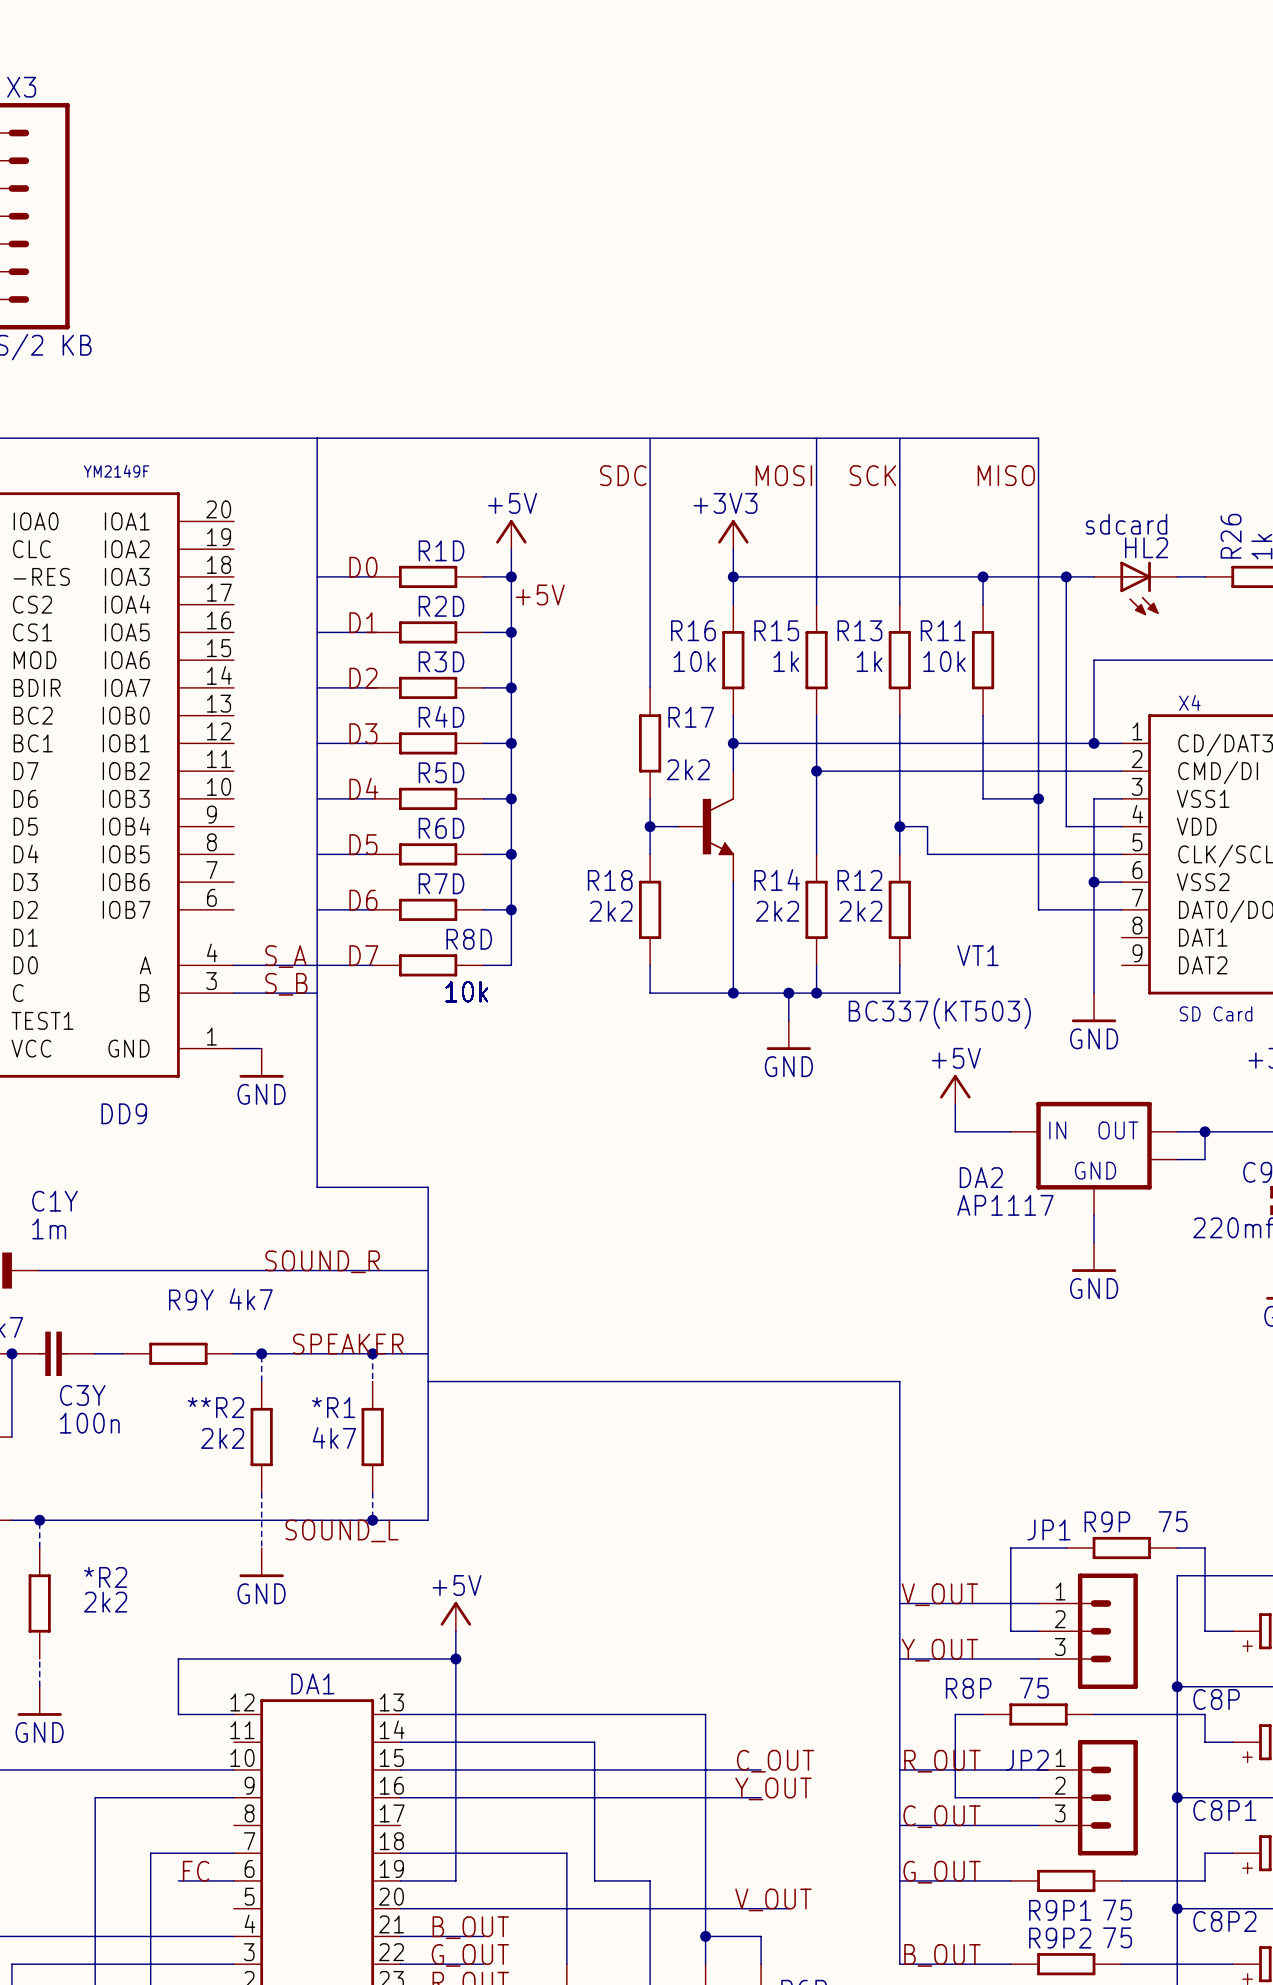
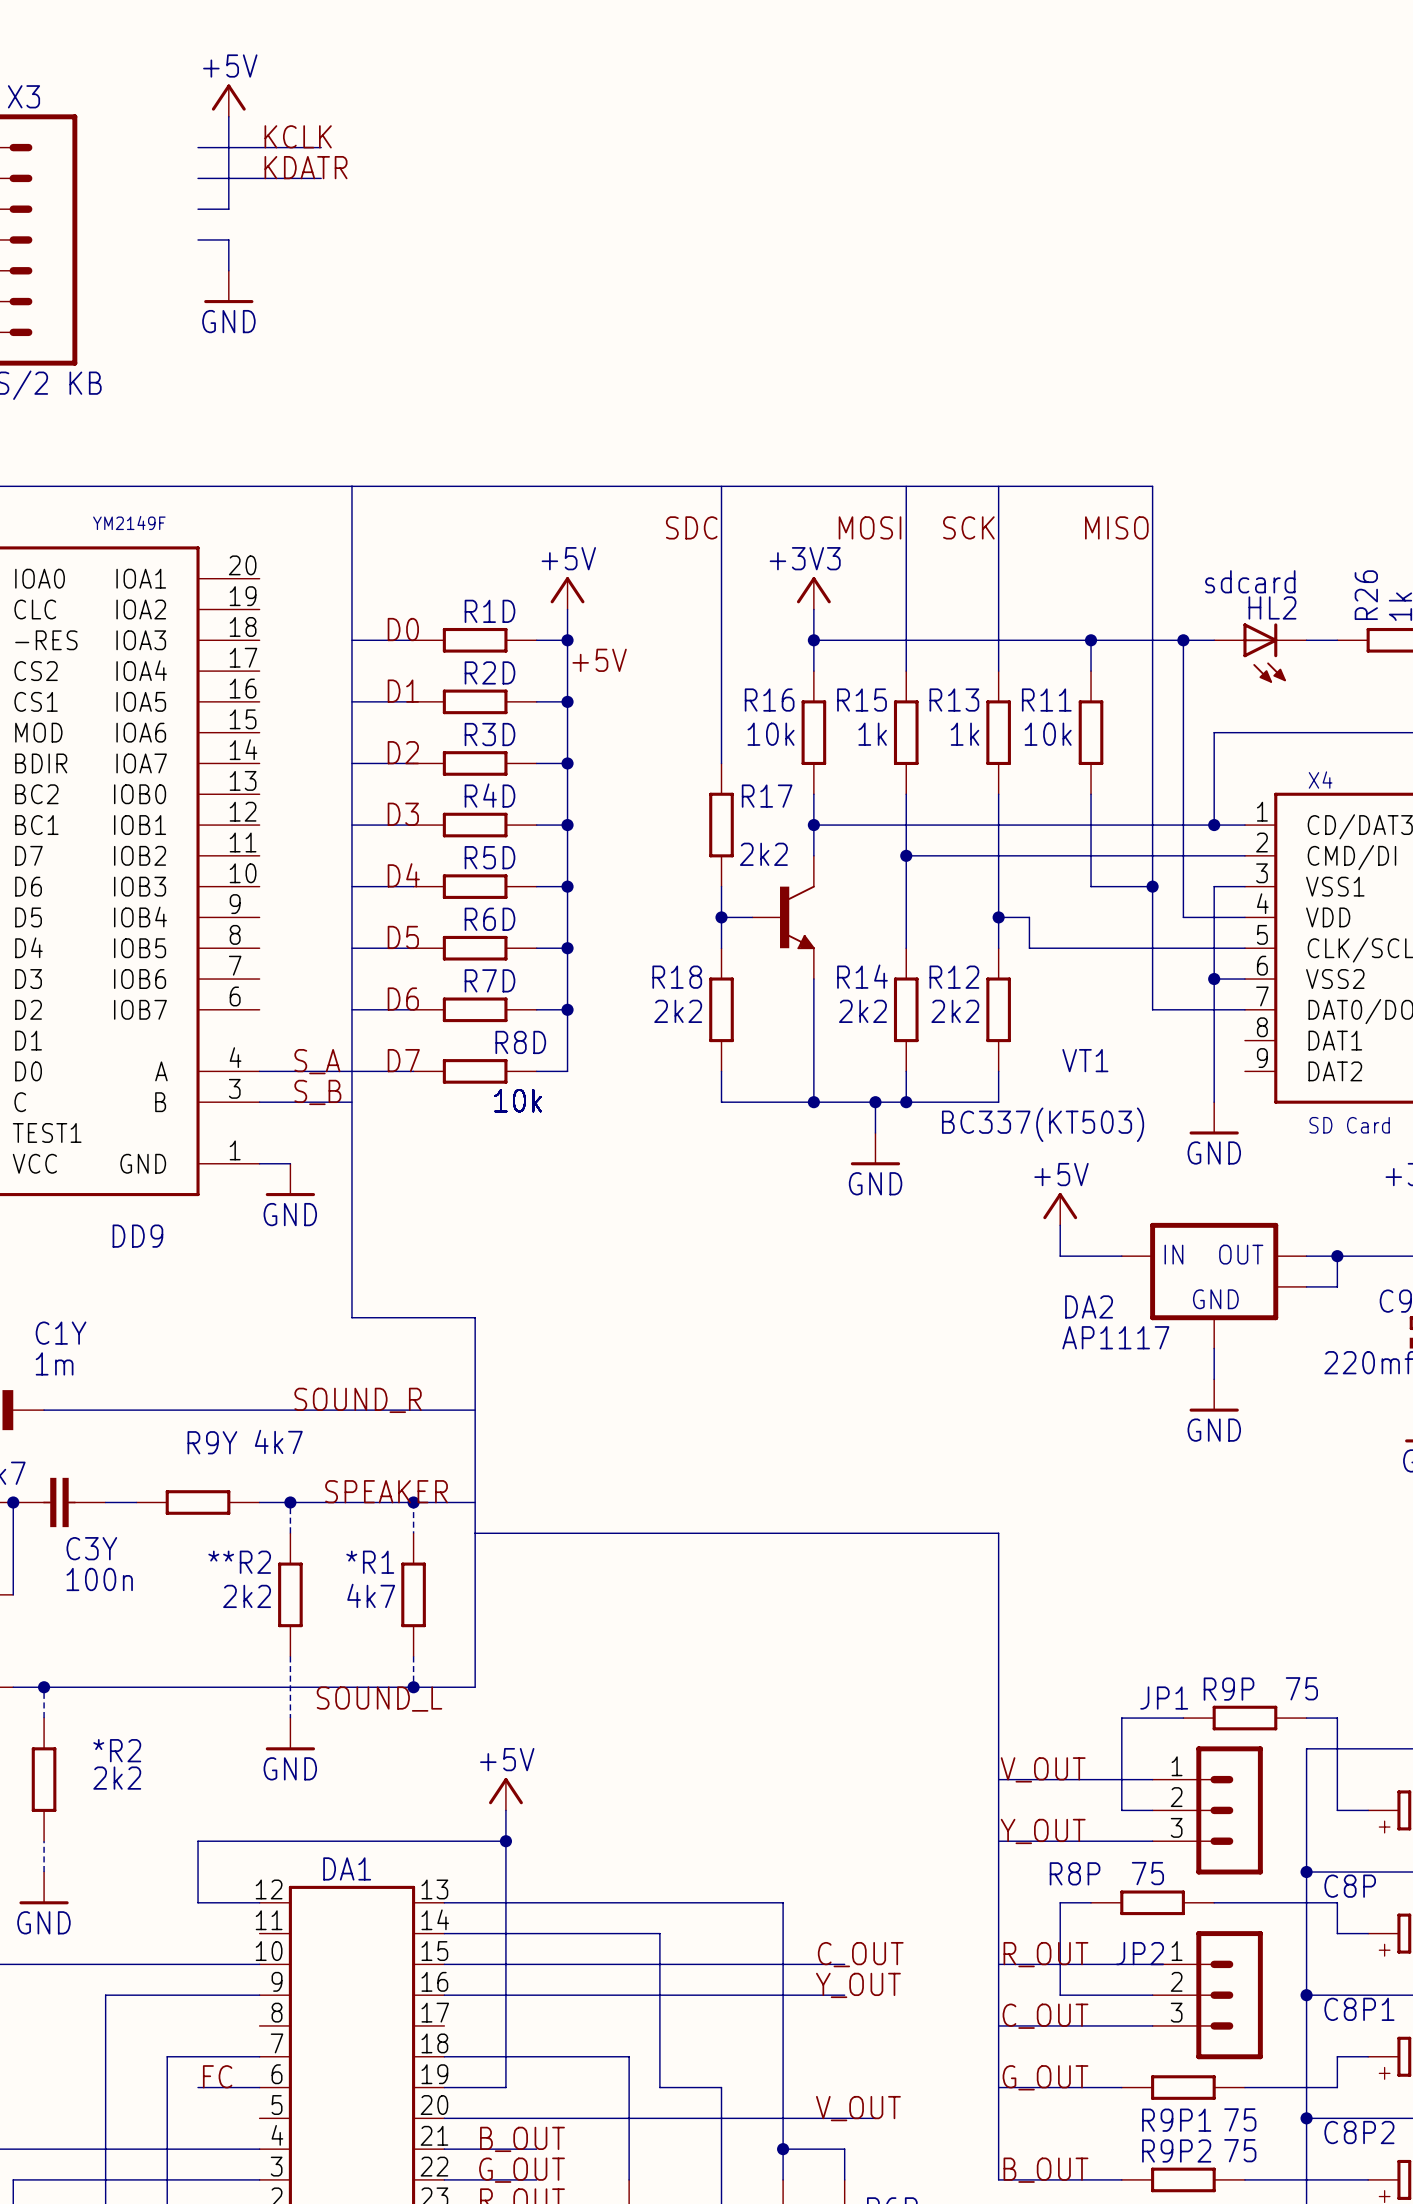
power symbol: none -> +5V (228, 100)
wire: none -> (228, 116) (228, 209) (198, 209)
label: none -> KCLK (298, 136)
wire: none -> (198, 147) (321, 147)
label: none -> KDATR (306, 167)
wire: none -> (198, 178) (321, 178)
wire: none -> (198, 239) (228, 239) (228, 270)
power symbol: none -> GND (228, 286)

